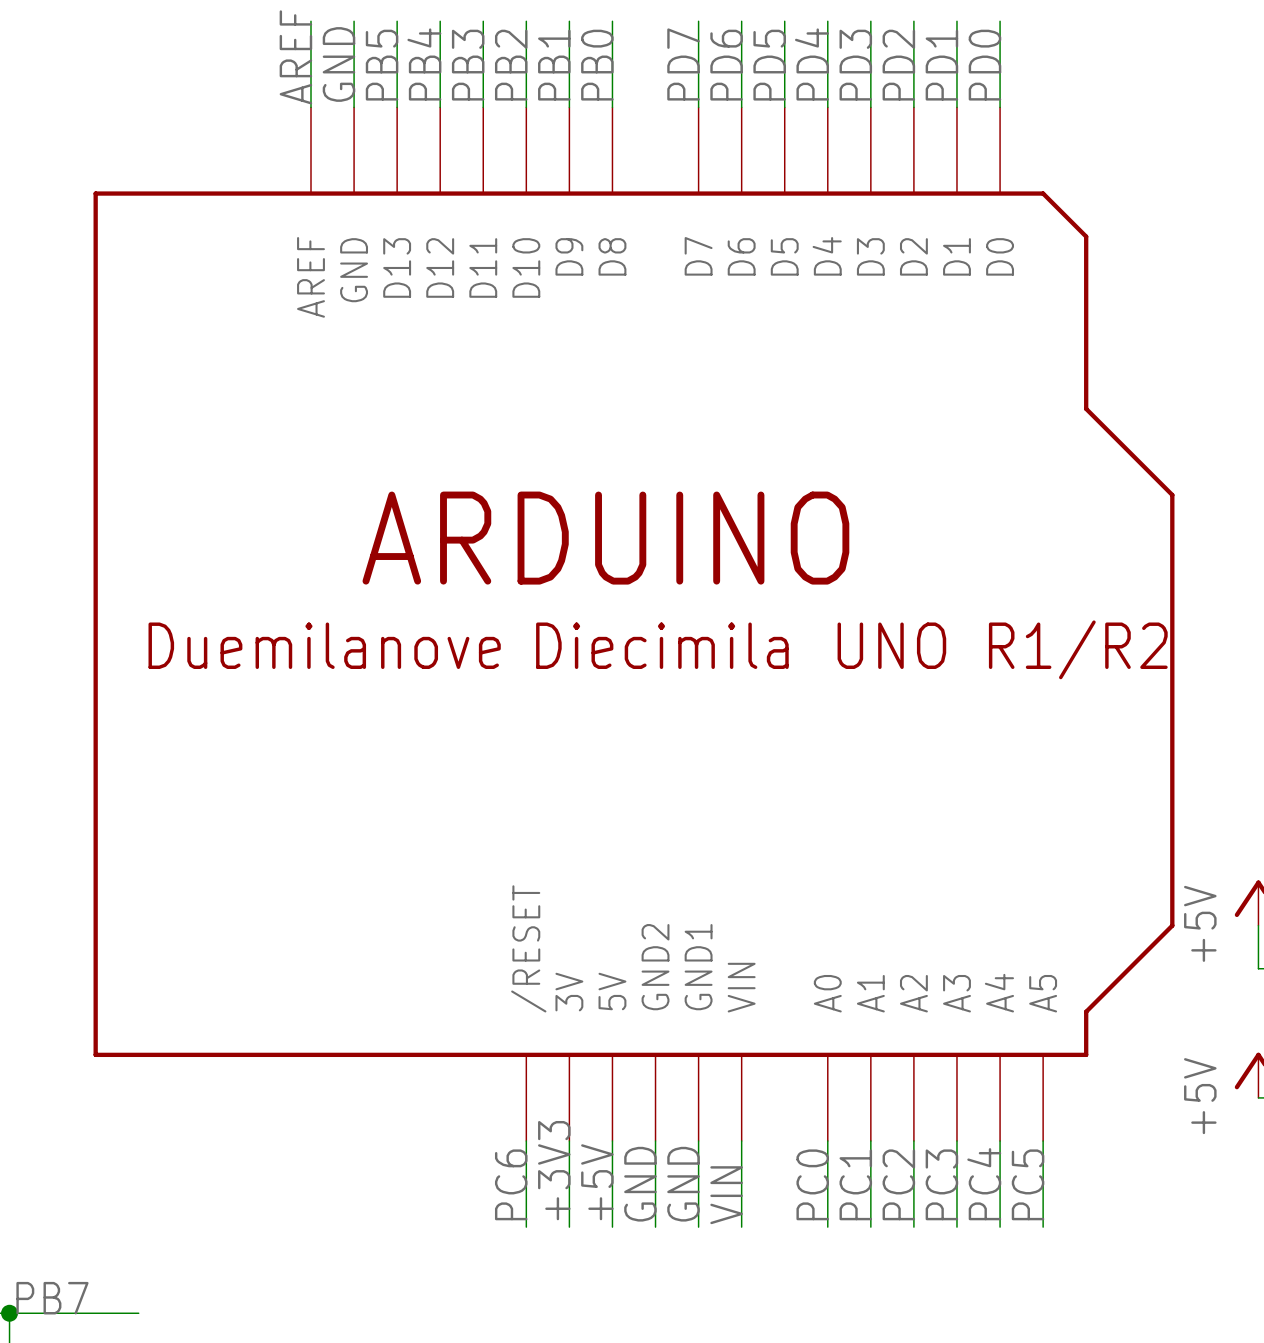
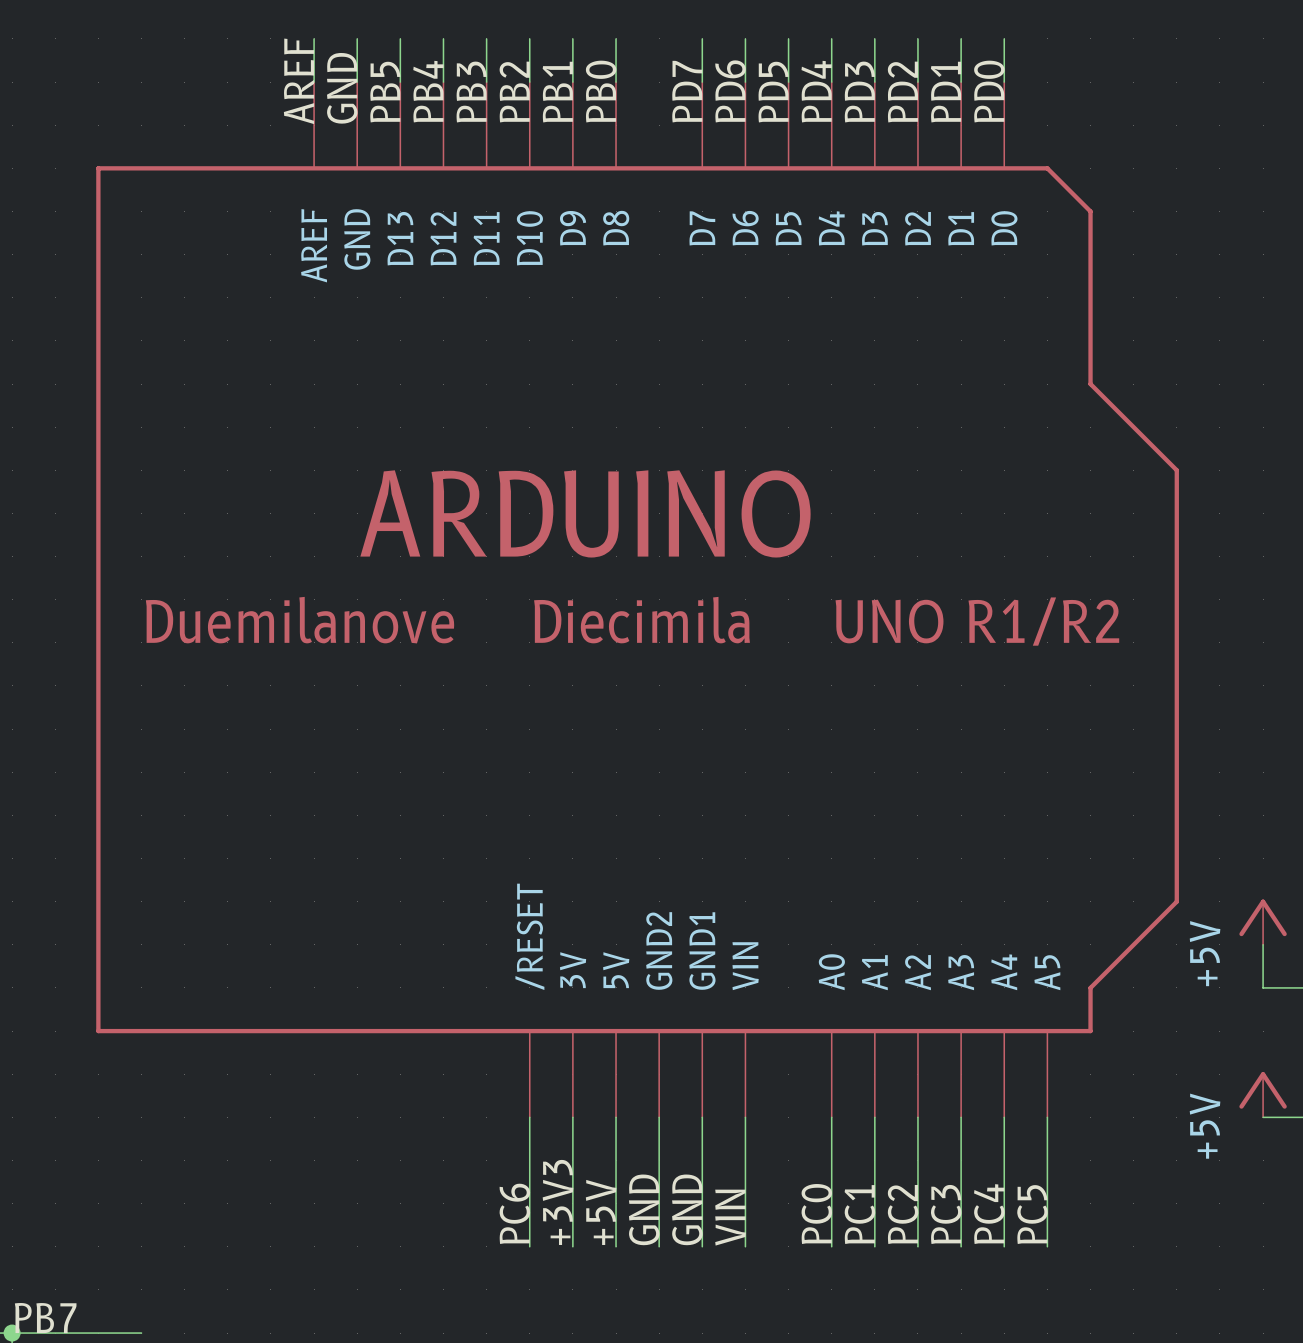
part position: (633, 624) -> (637, 599)

